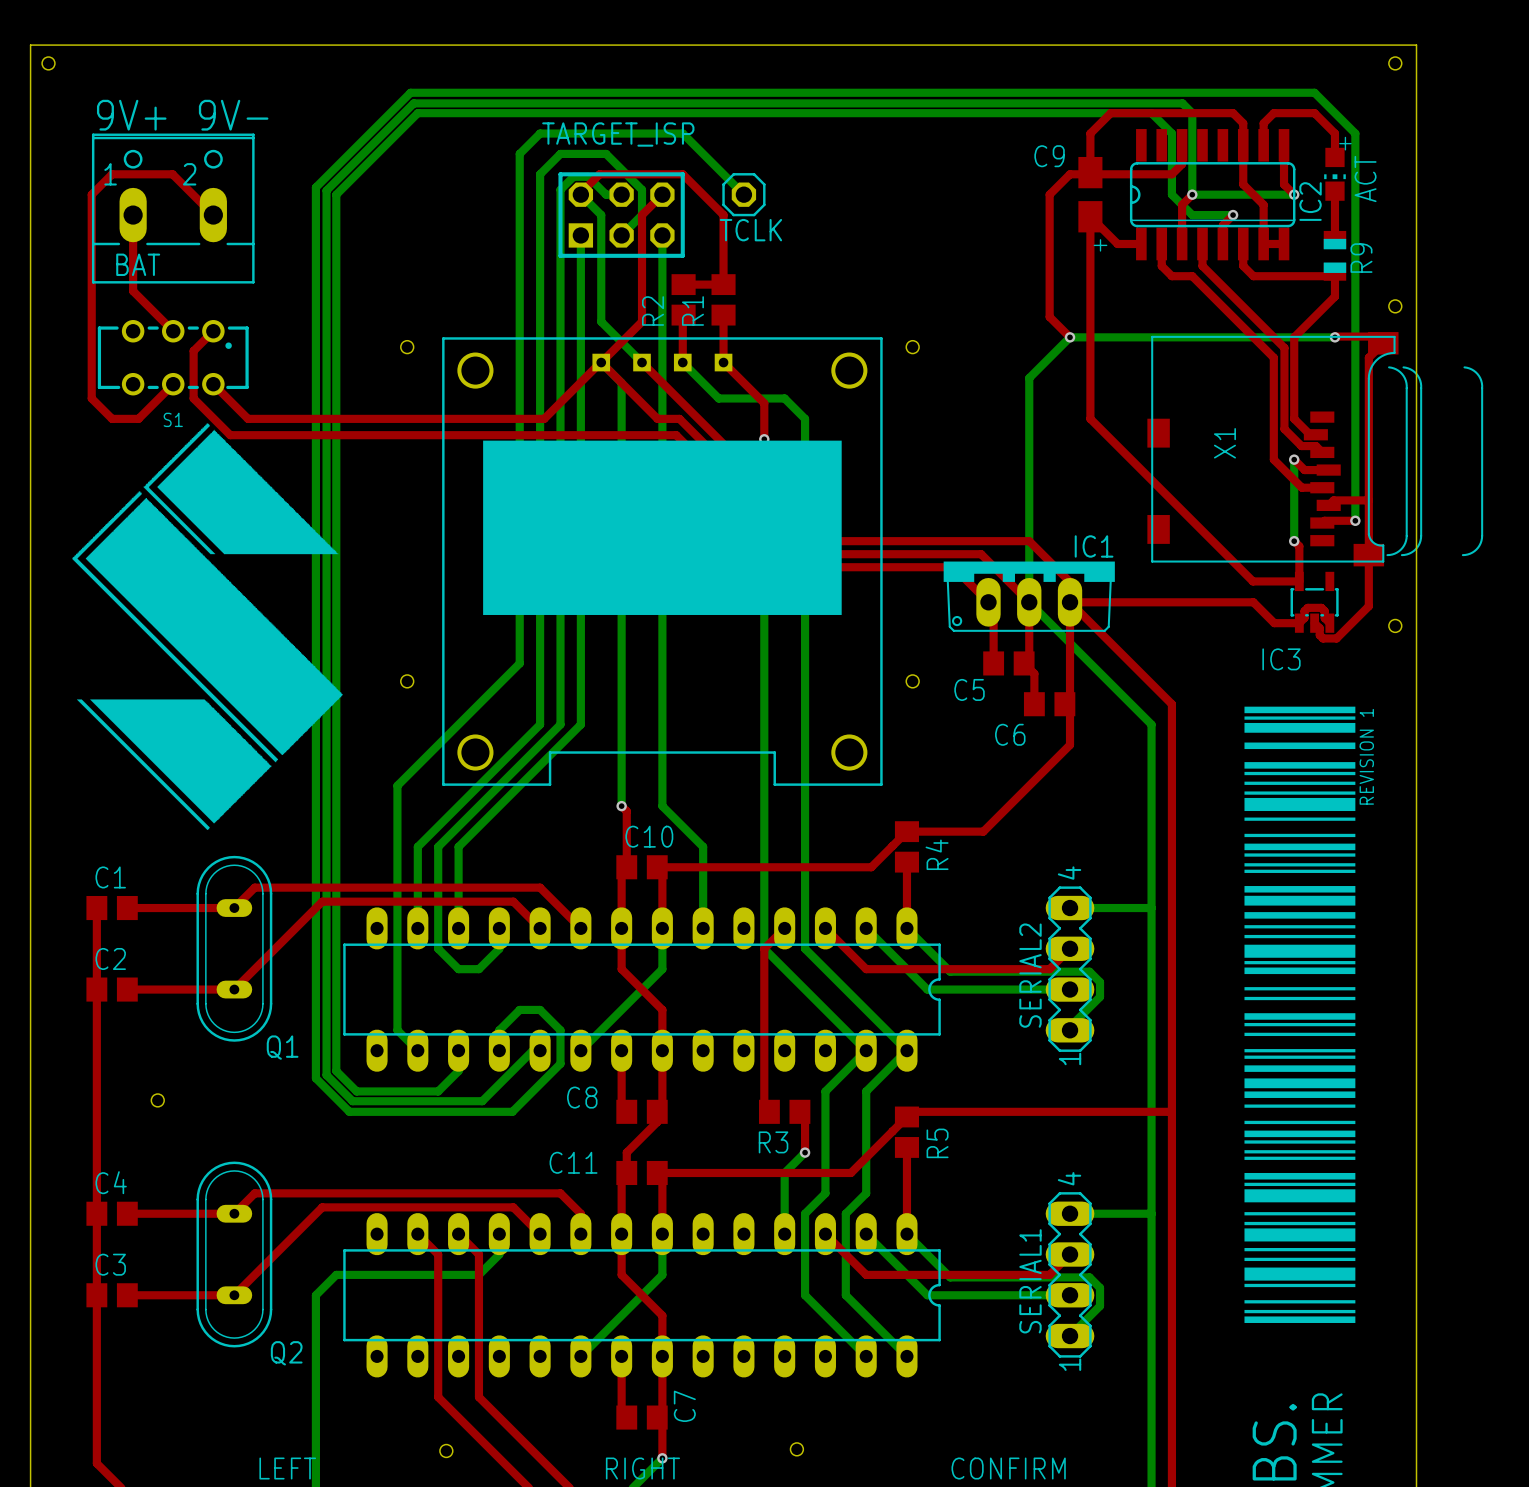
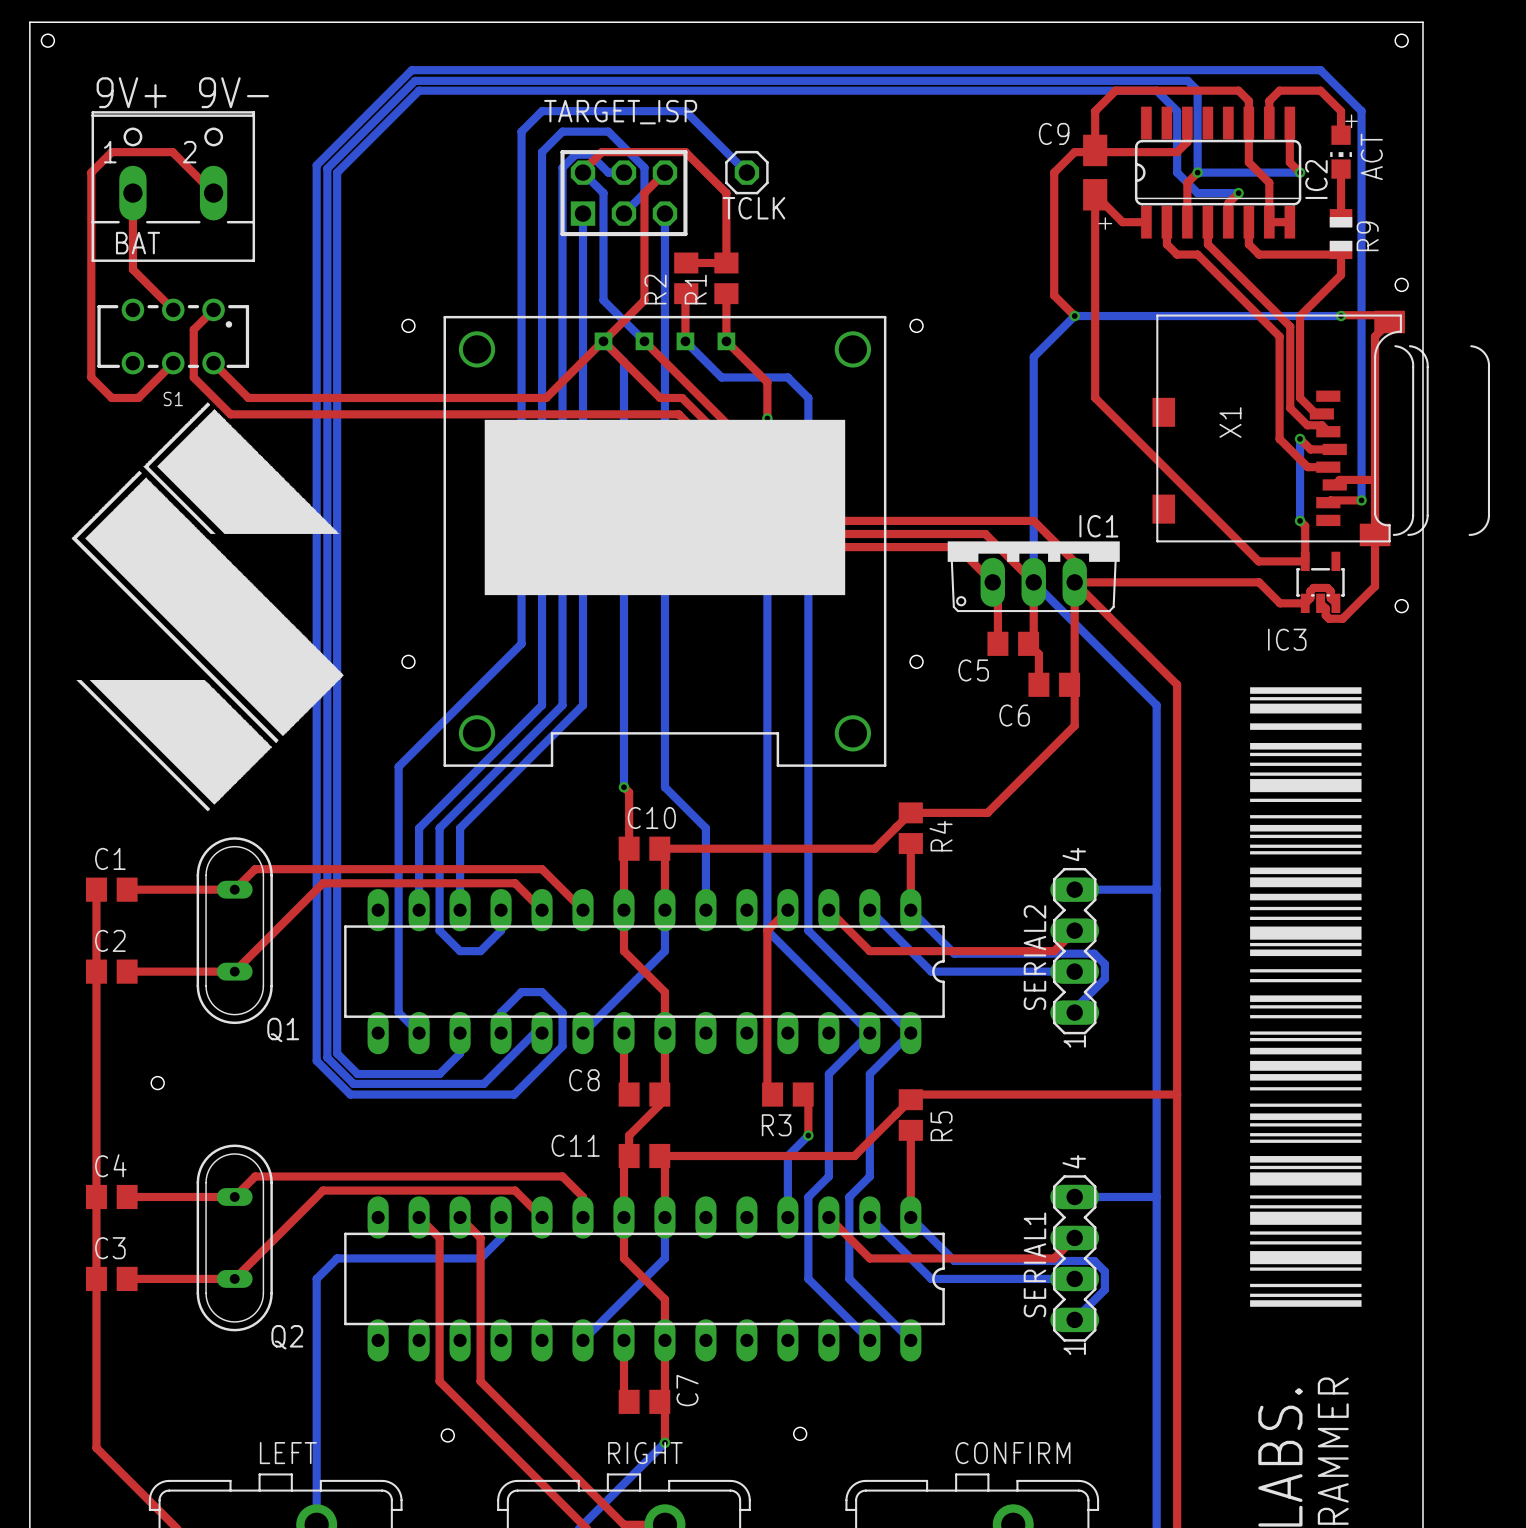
text: REVISION 1 (1366, 756) -> none

